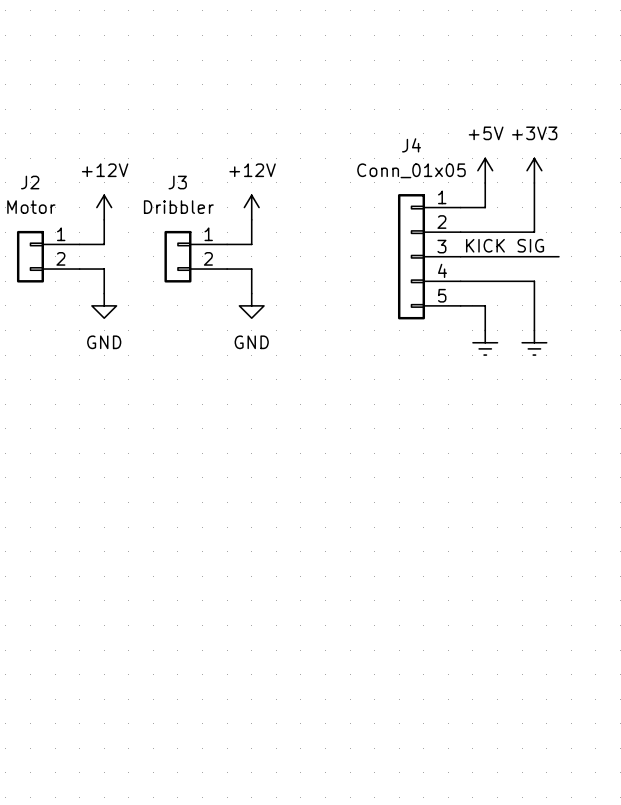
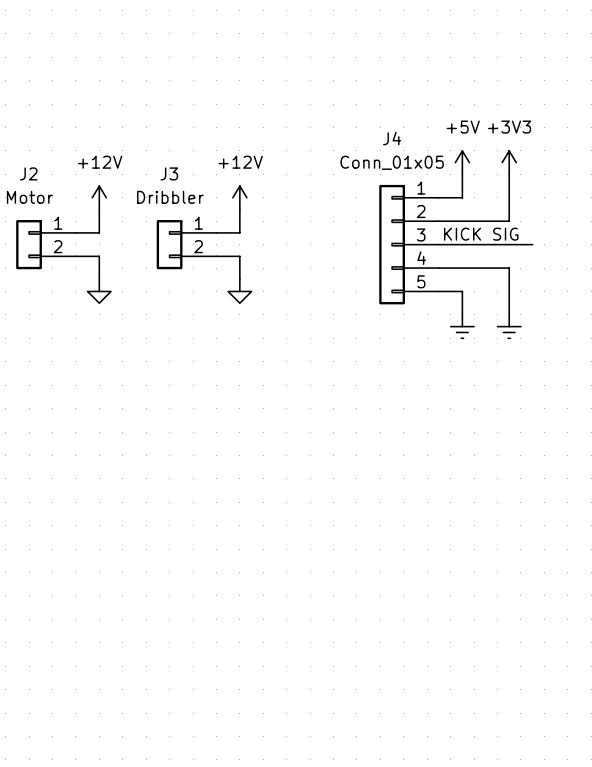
power symbol text: GND (104, 342) -> none
power symbol text: GND (251, 342) -> none

